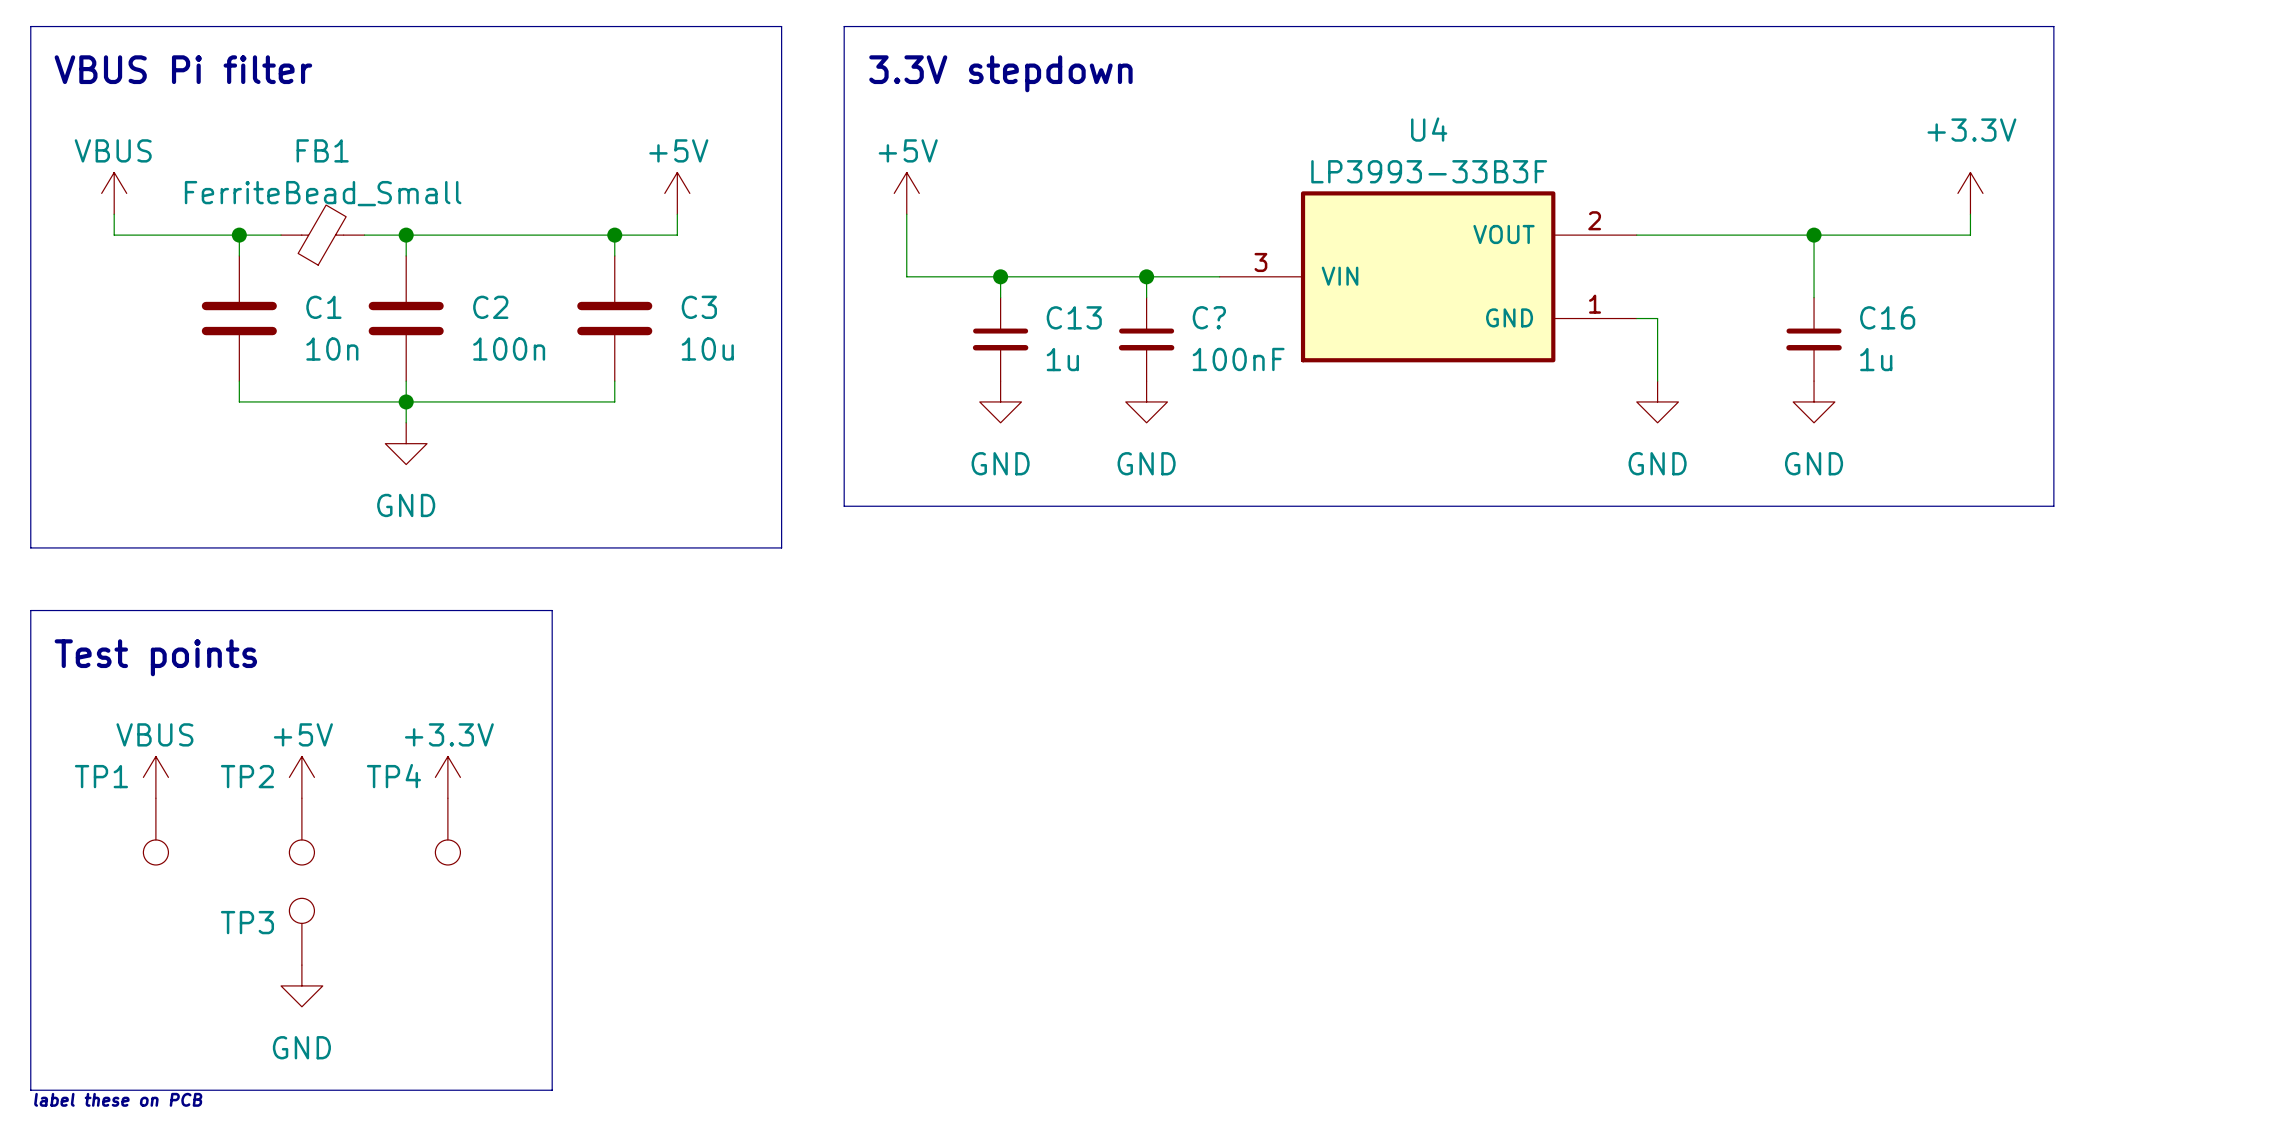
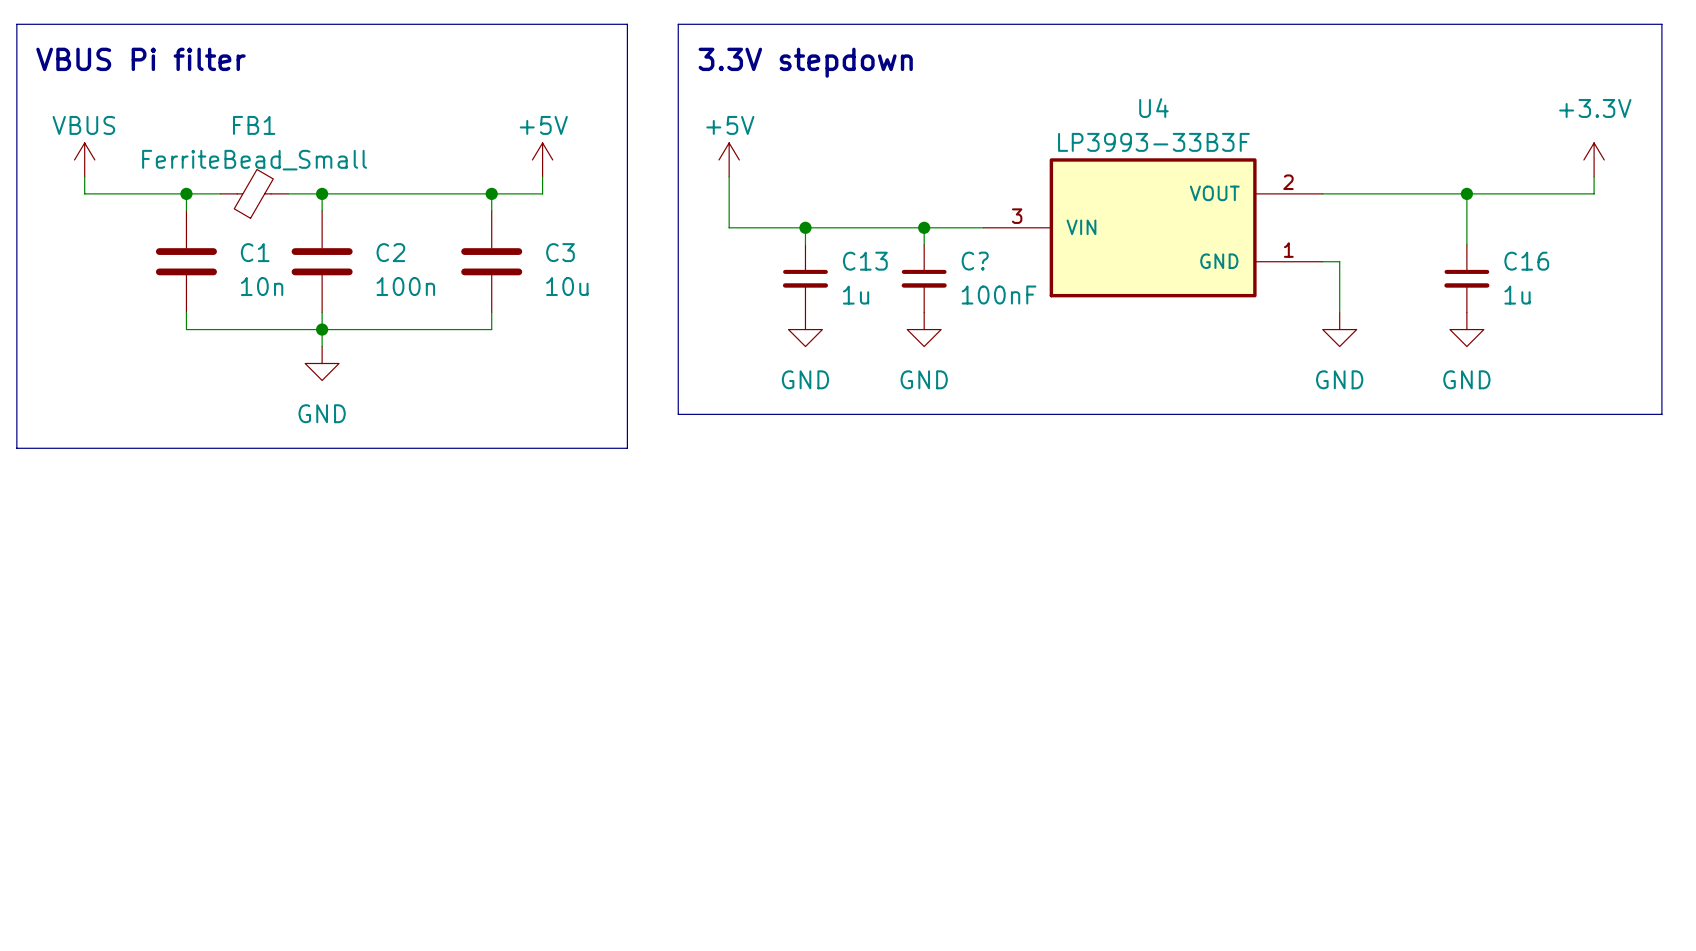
line: (30, 610) (552, 610) (552, 1090) (30, 1090) (30, 610) -> none
text: Test points (155, 657) -> none
power symbol: VBUS (155, 777) -> none
power symbol: +5V (301, 777) -> none
power symbol: +3.3V (447, 777) -> none
TP1: (155, 831) -> none
TP2: (301, 831) -> none
TP4: (447, 831) -> none
TP3: (301, 931) -> none
power symbol: GND (301, 985) -> none
text: label these on PCB (118, 1099) -> none

